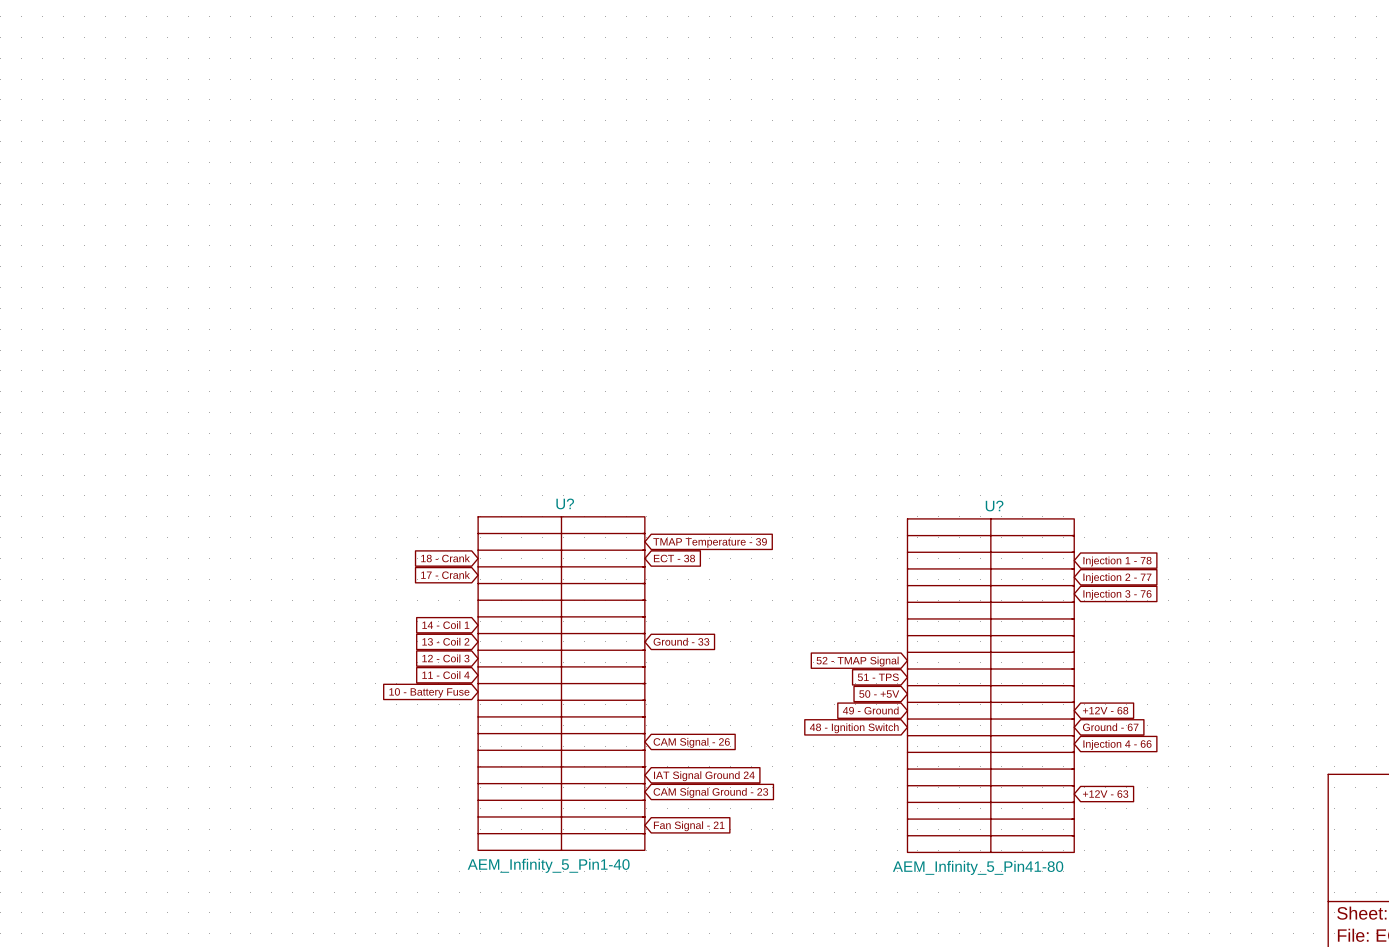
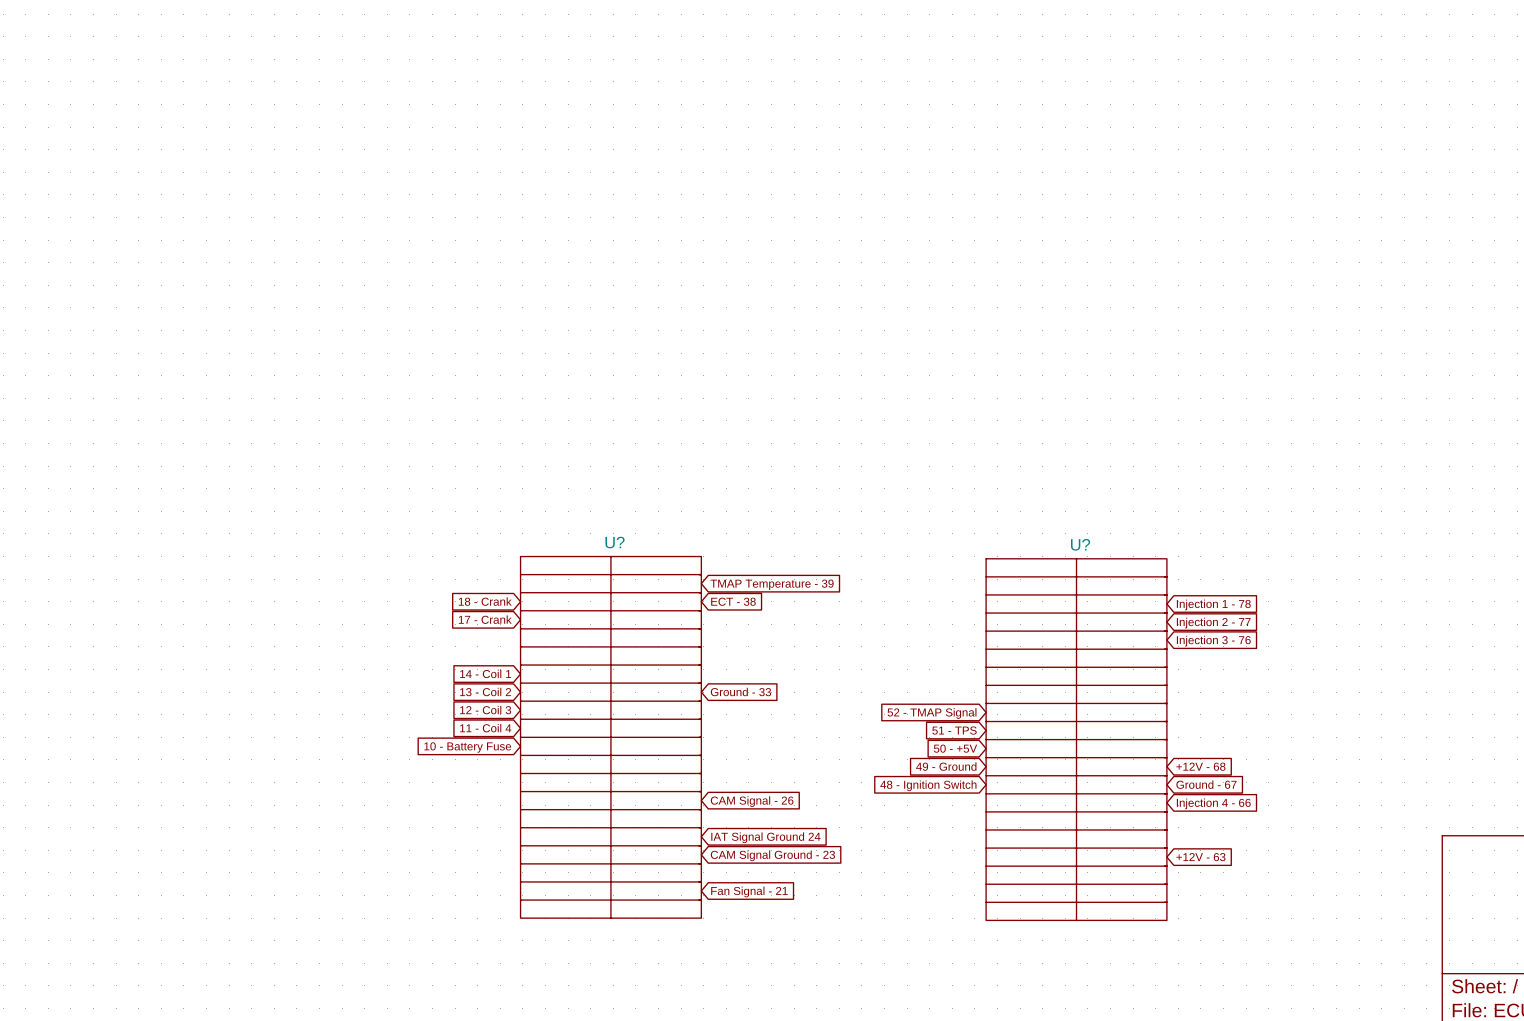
U? value: AEM_Infinity_5_Pin1-40 (548, 865) -> none
U? value: AEM_Infinity_5_Pin41-80 (978, 867) -> none

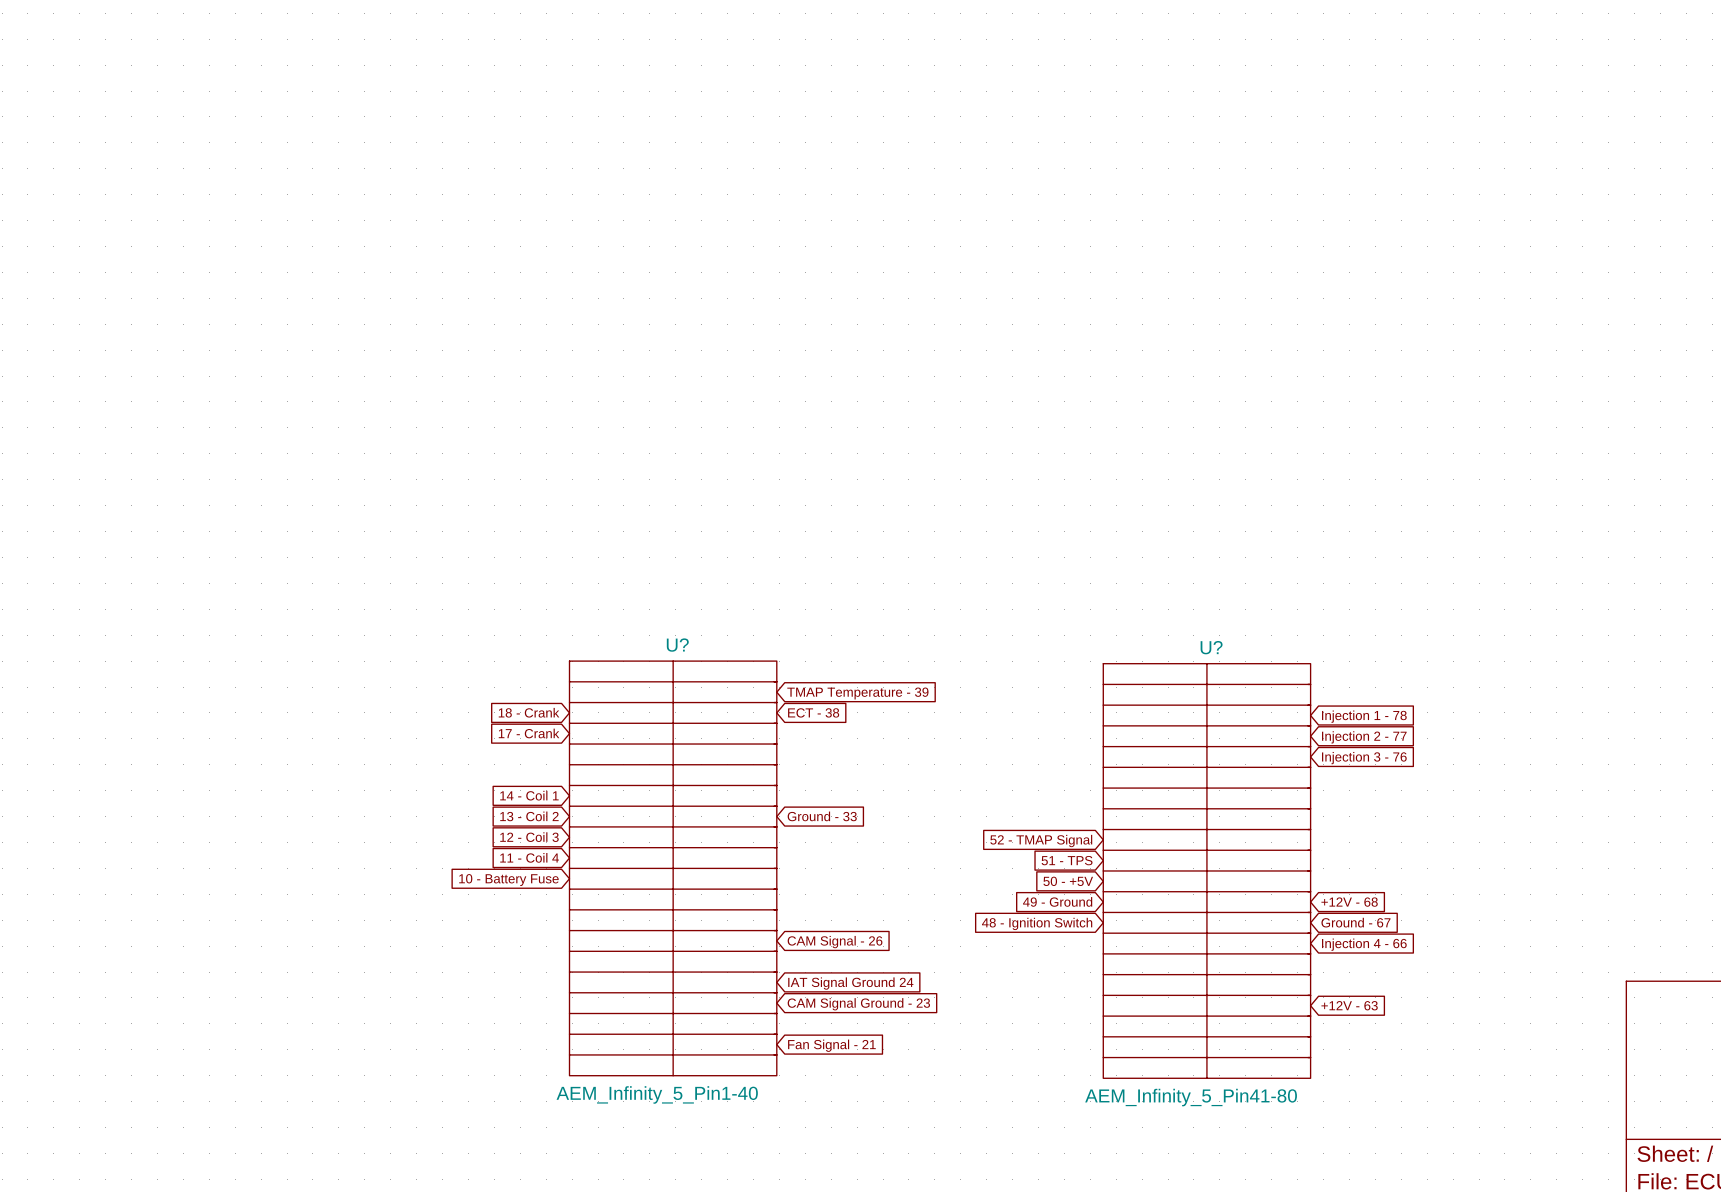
U? value: none -> AEM_Infinity_5_Pin1-40 (657, 1094)
U? value: none -> AEM_Infinity_5_Pin41-80 (1191, 1097)

